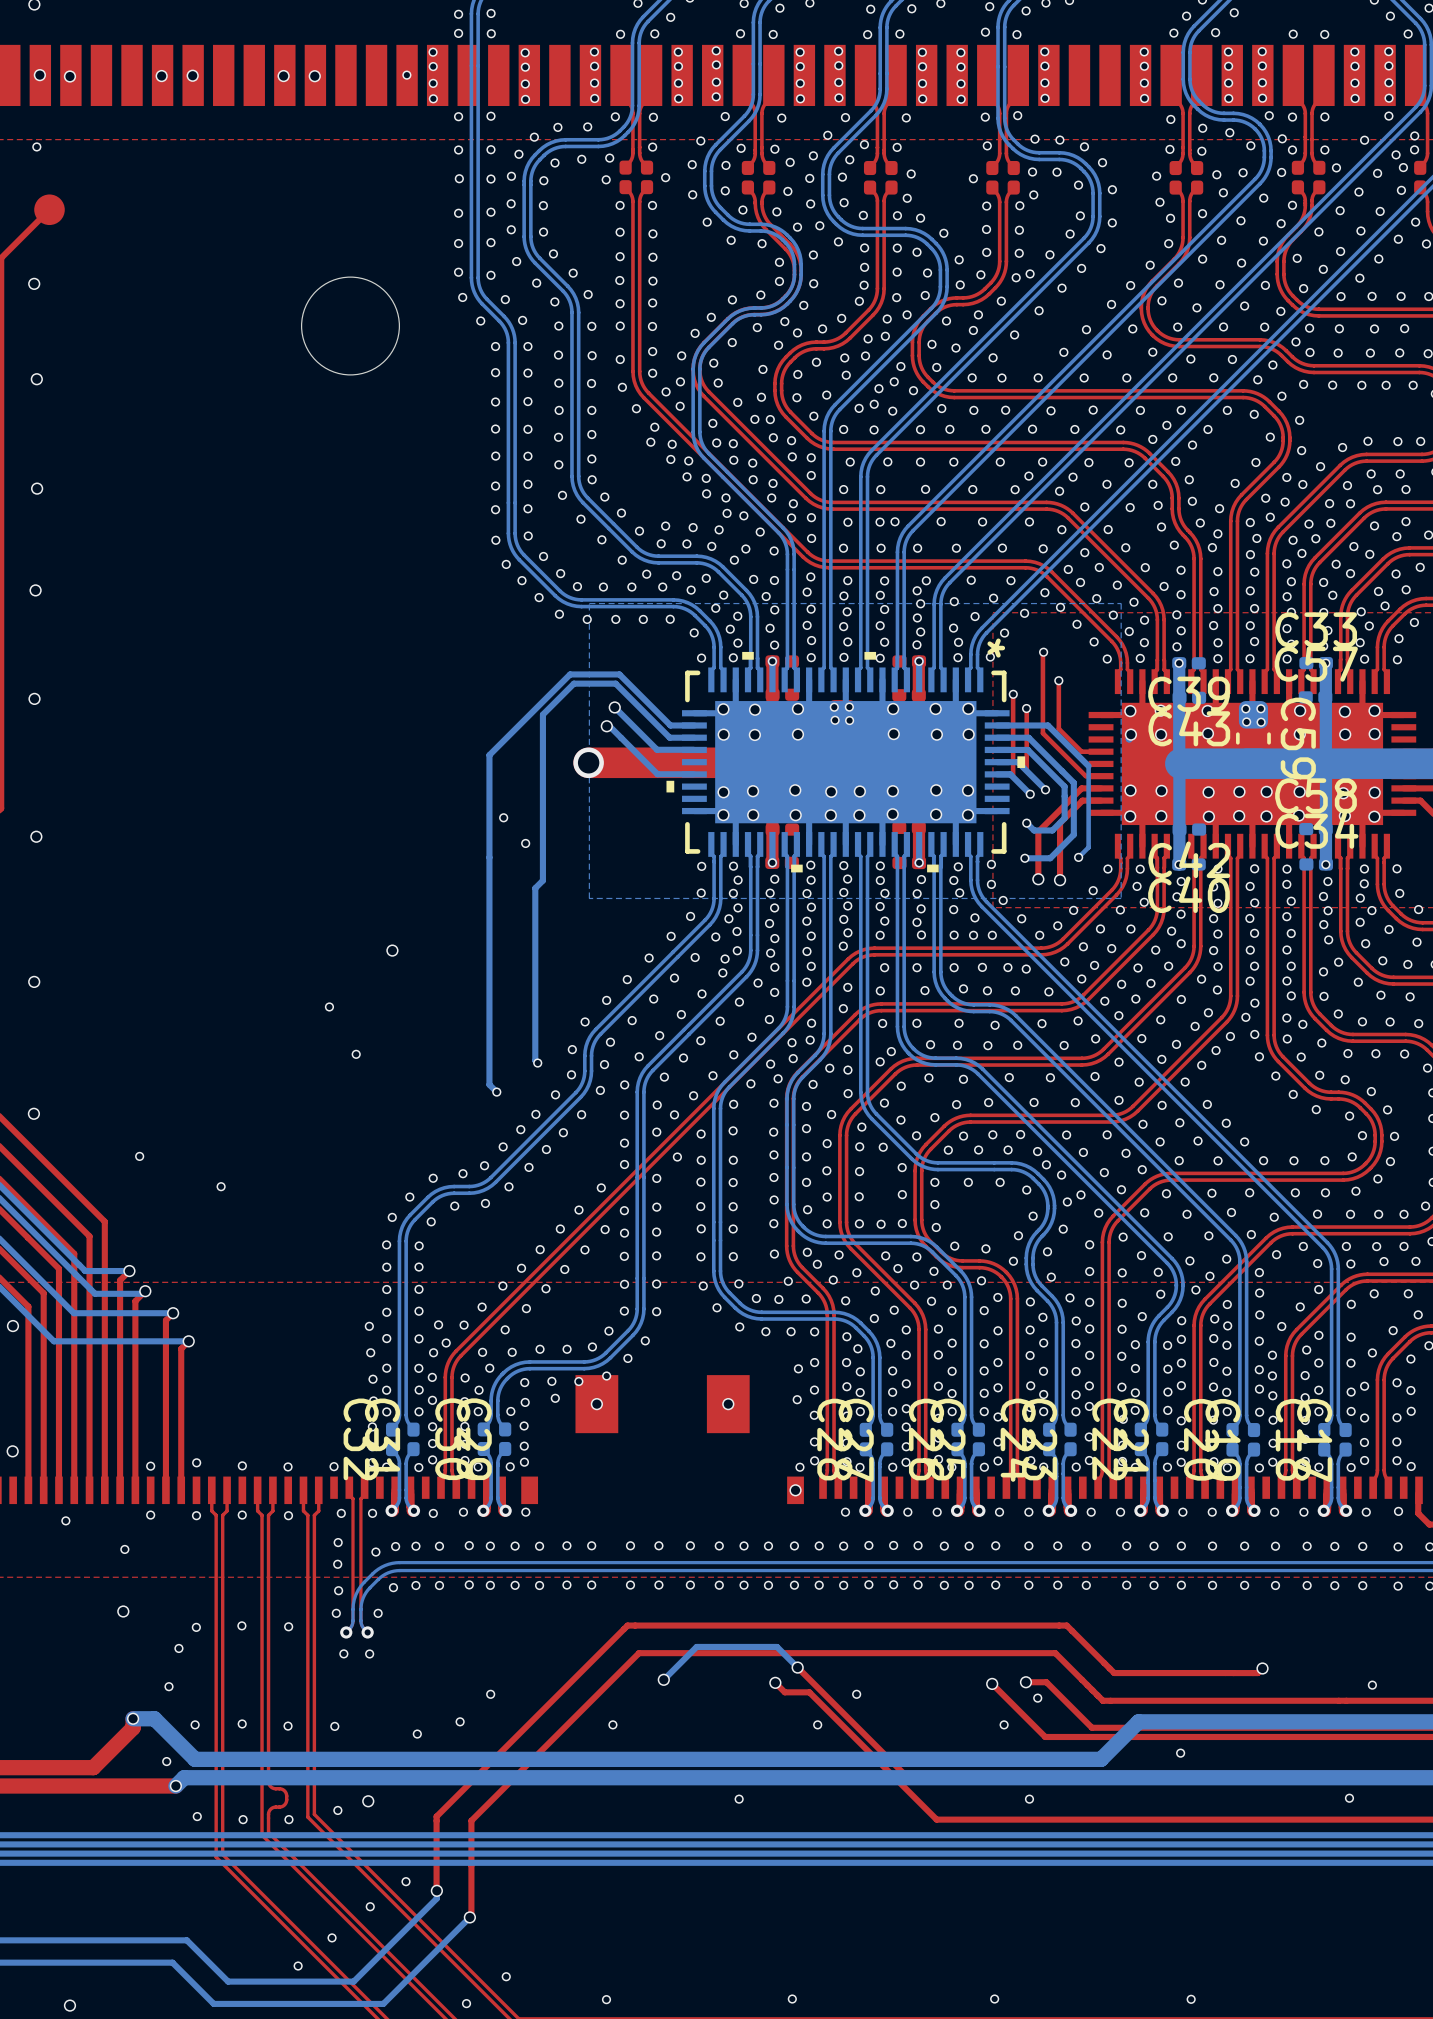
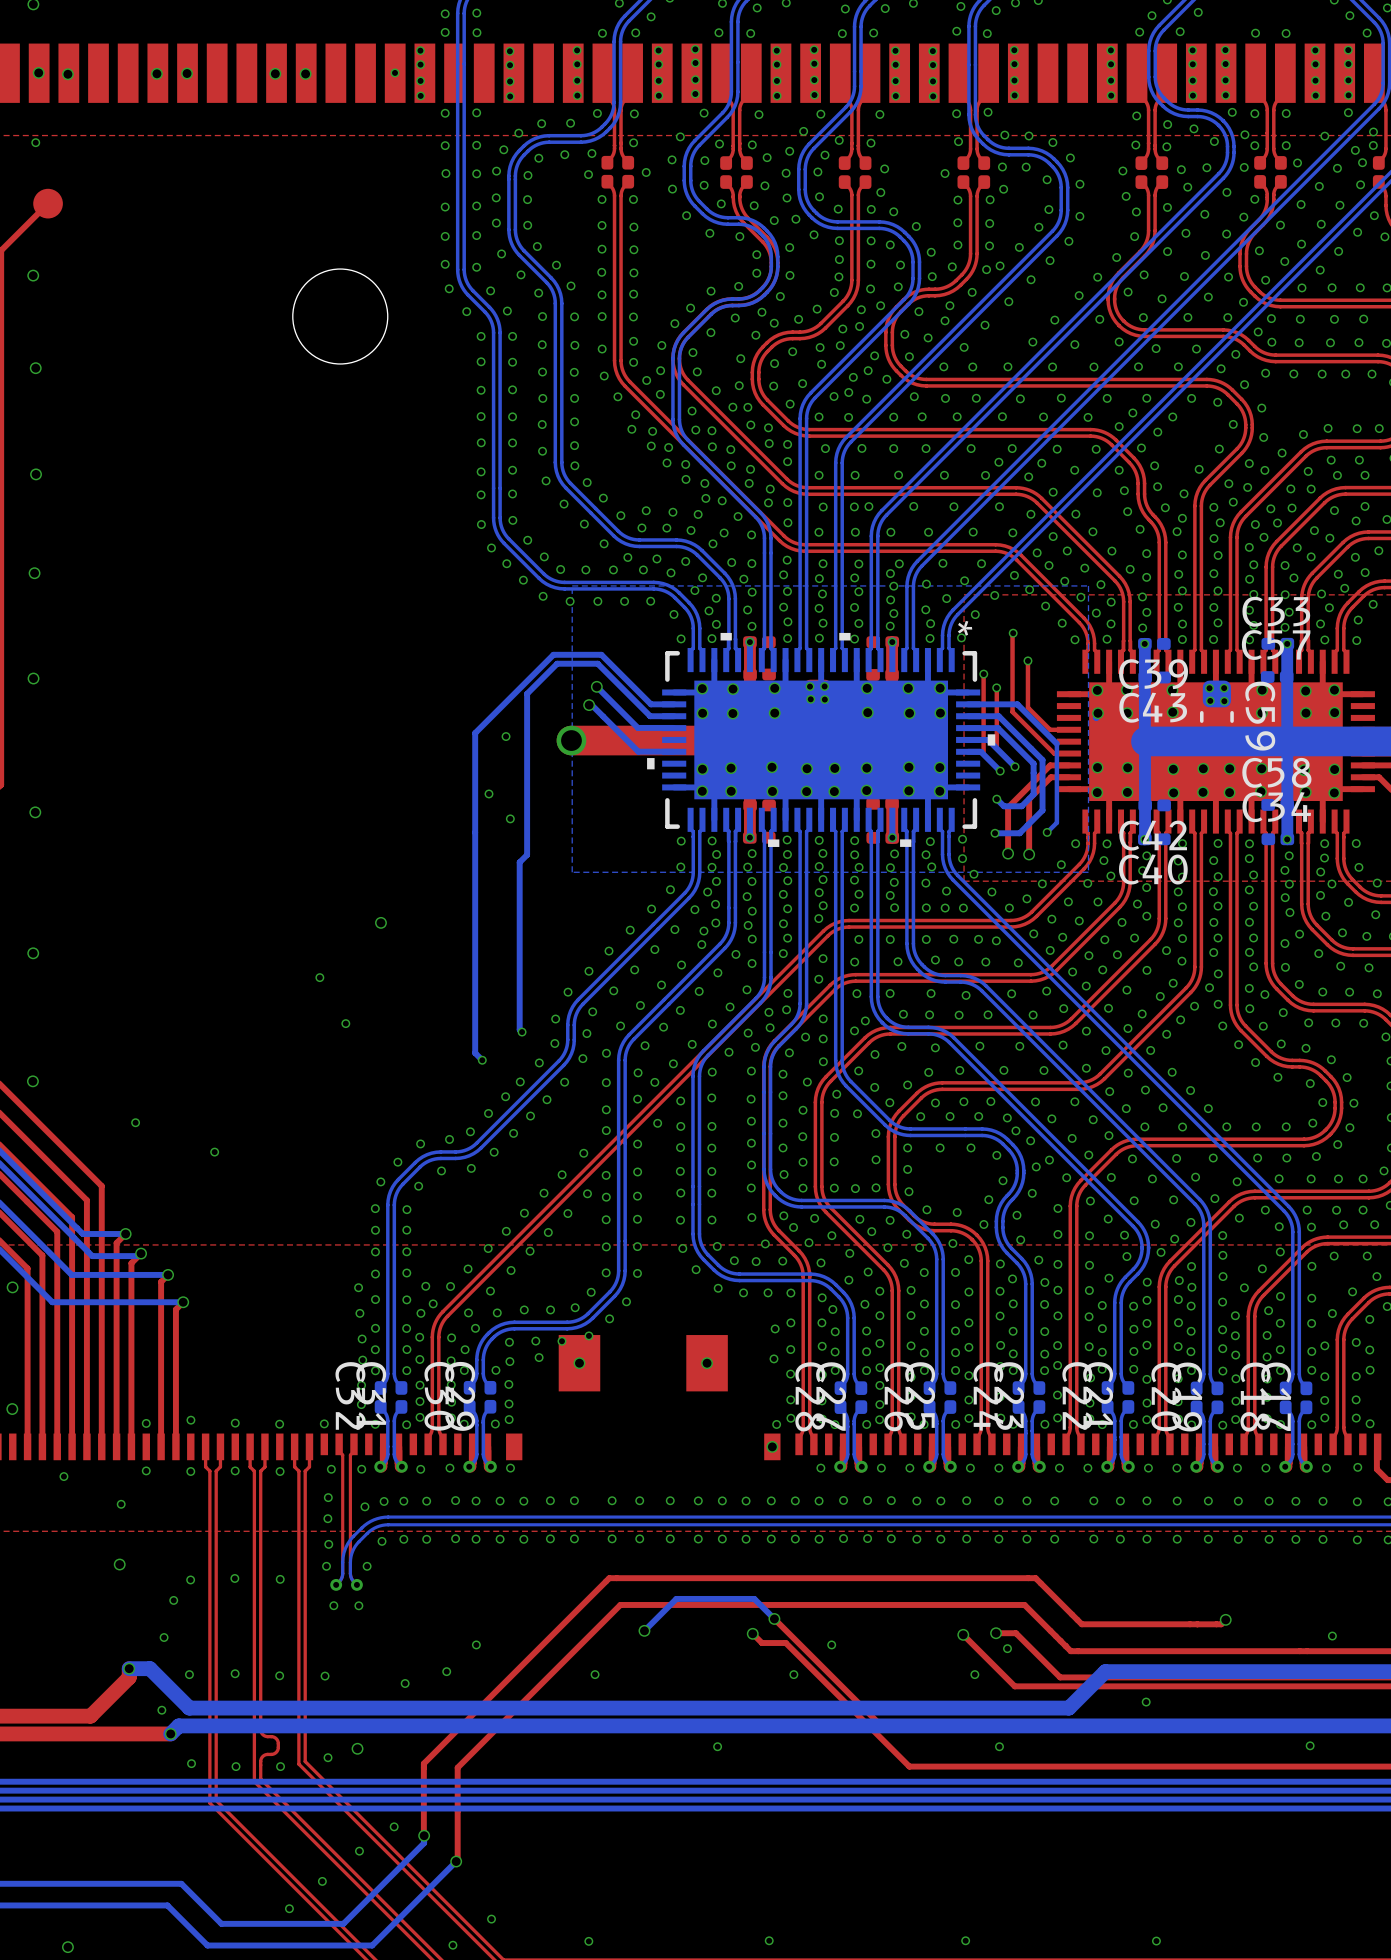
via: none -> (506, 736)

